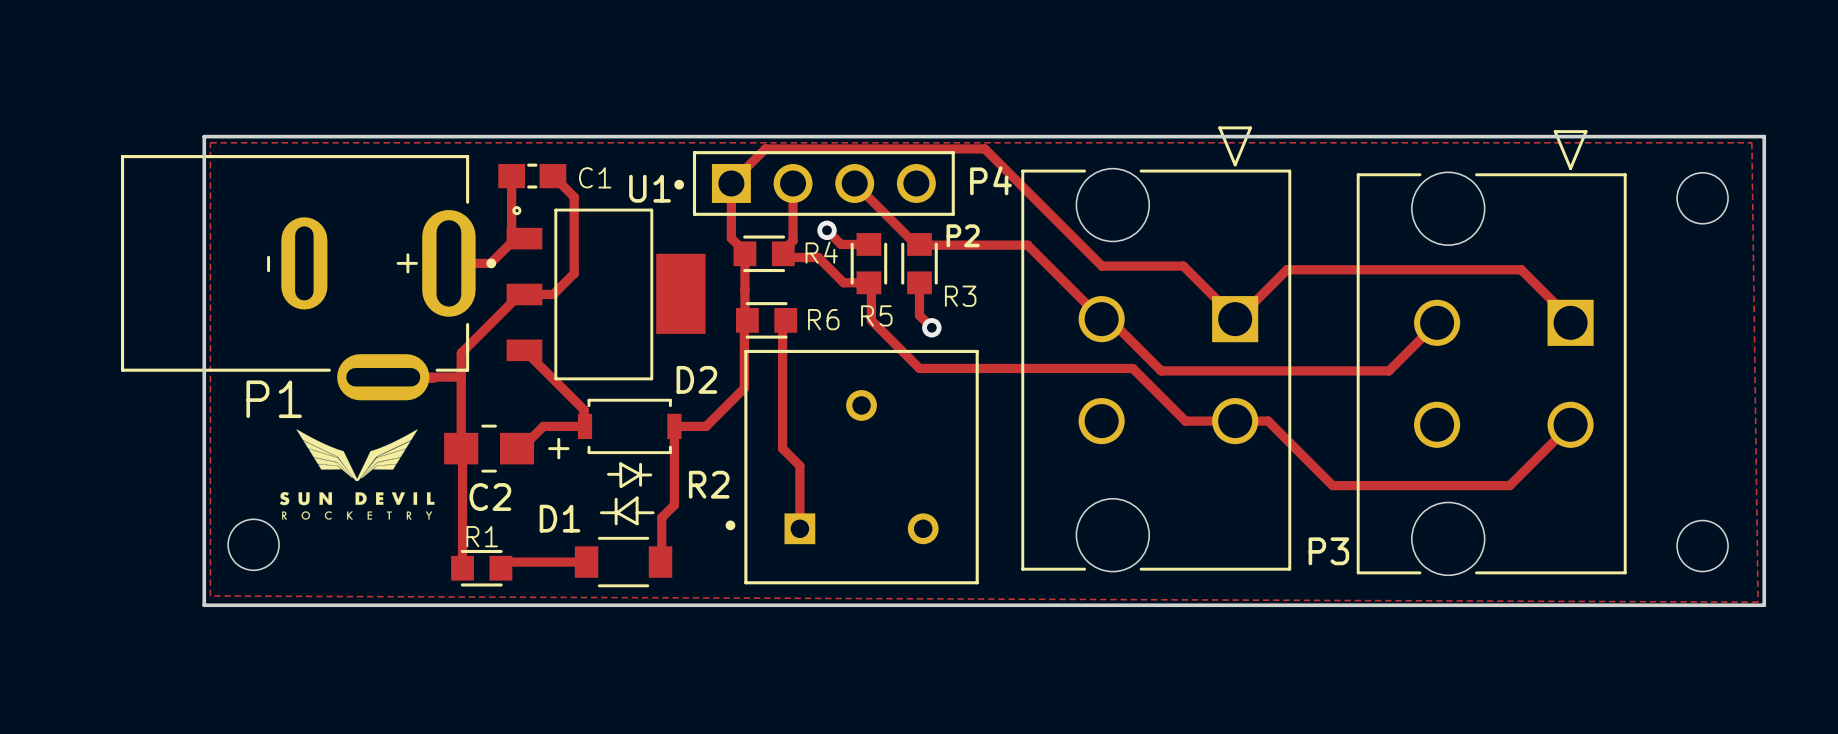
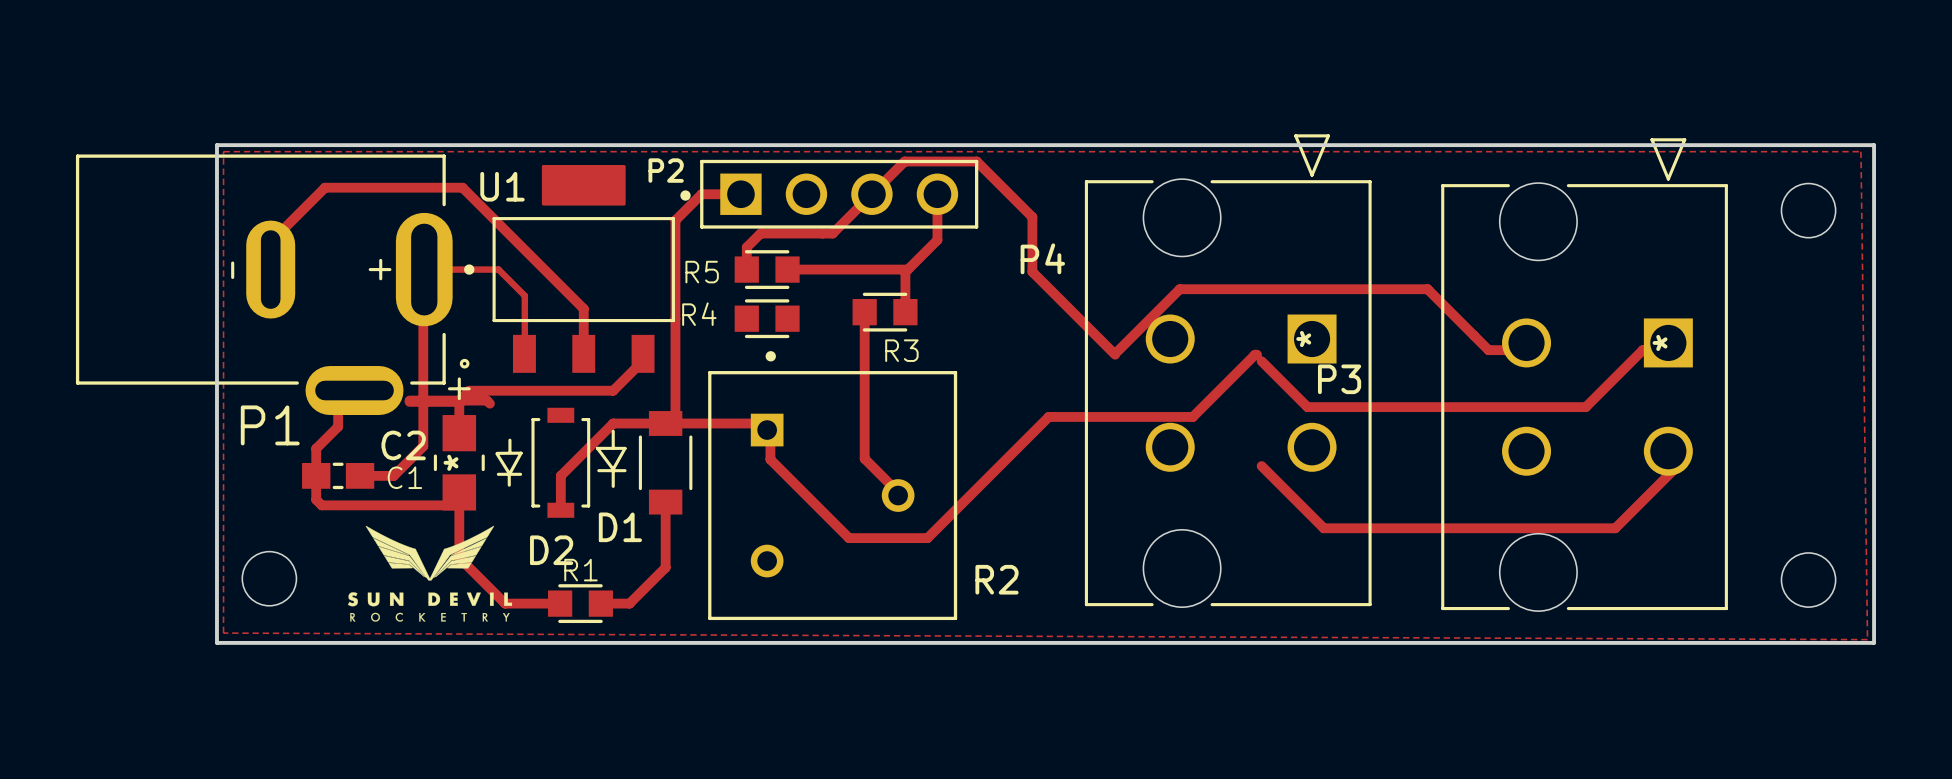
track: (511, 176) (511, 229) (518, 236) -> none
C1 position: (532, 176) -> (338, 475)
track: (734, 179) (765, 148) (984, 148) (1102, 266) (1183, 266) (1235, 319) -> none
P4 name position: P4 (990, 180) -> P4 (1042, 258)
track: none -> (744, 194) (701, 194) (675, 220) (675, 420)
track: none -> (937, 194) (937, 240) (907, 269) (787, 269)
track: (731, 183) (731, 238) (738, 245) -> none
track: (793, 183) (793, 240) (781, 252) -> none
P2 position: (814, 183) -> (829, 194)
track: (854, 183) (912, 240) -> none
track: (561, 184) (574, 197) (574, 273) (553, 294) (517, 294) -> none
U1 name position: U1 (650, 188) -> U1 (502, 186)
U1 footprint: [506, 206, 706, 381] -> [459, 164, 675, 373]
track: none -> (269, 243) (325, 187) (462, 187) (583, 308) (583, 353)
track: (827, 230) (841, 244) (868, 244) -> none
via: (827, 230) -> none
P2 name position: P2 (963, 235) -> P2 (666, 170)
track: (511, 242) (490, 263) (448, 263) -> none
track: (921, 245) (1027, 245) (1101, 319) -> none
track: (741, 251) (744, 254) (745, 316) -> none
R4 name position: R4 (821, 252) -> R4 (699, 314)
track: none -> (746, 269) (746, 247) (760, 233) (832, 233) (904, 161) (976, 161) (1032, 217) (1032, 271) (1115, 354)
R4 position: (764, 253) -> (767, 318)
track: none -> (905, 272) (905, 312)
track: (785, 257) (818, 257) (843, 282) (868, 282) -> none
R5 rotation: 0° (868, 263) -> 90° clockwise (767, 269)
R5 position: (868, 263) -> (767, 269)
R3 rotation: 0° (919, 263) -> 90° clockwise (885, 312)
R3 position: (919, 263) -> (885, 312)
track: none -> (423, 285) (423, 446) (393, 475) (360, 475)
track: none -> (424, 286) (424, 269) (498, 269) (524, 295) (524, 354)
P1 position: (308, 277) -> (275, 284)
track: (919, 282) (919, 315) (931, 327) -> none
track: (871, 283) (871, 320) (919, 368) (1132, 368) (1185, 421) (1268, 421) (1332, 485) (1509, 485) (1570, 424) -> none
track: none -> (864, 312) (864, 458) (898, 492)
track: (519, 294) (461, 353) (461, 448) -> none
track: (745, 317) (744, 388) (706, 426) (674, 426) (674, 505) (661, 517) (661, 560) -> none
P4 text: none -> * (1303, 339)
R6: (766, 320) -> none
track: (782, 320) (782, 448) (799, 465) (799, 528) -> none
track: (1110, 320) (1161, 370) (1388, 370) (1437, 322) -> none
track: (1236, 320) (1286, 269) (1521, 269) (1570, 319) (1570, 322) -> none
P3 text: none -> * (1660, 342)
via: (931, 327) -> none
track: none -> (1537, 350) (1488, 350) (1427, 289) (1179, 289) (1117, 351)
track: none -> (1679, 350) (1642, 350) (1585, 407) (1307, 407) (1261, 361)
track: none -> (1257, 354) (1192, 416) (1048, 416) (927, 538) (849, 538) (770, 459) (770, 436)
track: none -> (639, 364) (613, 390) (469, 390) (459, 400) (459, 433)
track: (524, 350) (584, 409) (584, 423) -> none
track: none -> (338, 394) (338, 426) (316, 448) (316, 499) (321, 505) (456, 505)
D2 name position: D2 (696, 379) -> D2 (551, 550)
track: none -> (662, 423) (613, 423) (560, 475) (560, 510)
track: none -> (665, 423) (757, 423) (760, 426)
P1 name position: P1 (274, 399) -> P1 (270, 425)
C2 footprint: [444, 424, 570, 473] -> [433, 377, 485, 511]
track: (585, 426) (543, 426) (527, 442) -> none
track: none -> (1261, 466) (1323, 528) (1615, 528) (1677, 466)
D2 rotation: 0° (629, 443) -> 90° clockwise (542, 462)
D2 position: (629, 443) -> (542, 462)
track: (462, 454) (462, 568) -> none
track: none -> (459, 495) (459, 557) (505, 603) (560, 603)
R2 rotation: 0° (852, 467) -> 90° clockwise (832, 485)
track: none -> (665, 502) (665, 567) (629, 603) (600, 603)
drawing position: (357, 474) -> (430, 573)
R2 name position: R2 (709, 484) -> R2 (997, 579)
C2 name position: C2 (490, 497) -> C2 (403, 445)
D1 rotation: 0° (623, 541) -> 90° counterclockwise (644, 462)
D1 position: (623, 541) -> (644, 462)
P3 name position: P3 (1328, 551) -> P3 (1339, 379)
track: (502, 562) (586, 562) -> none
R1 position: (481, 568) -> (580, 603)

